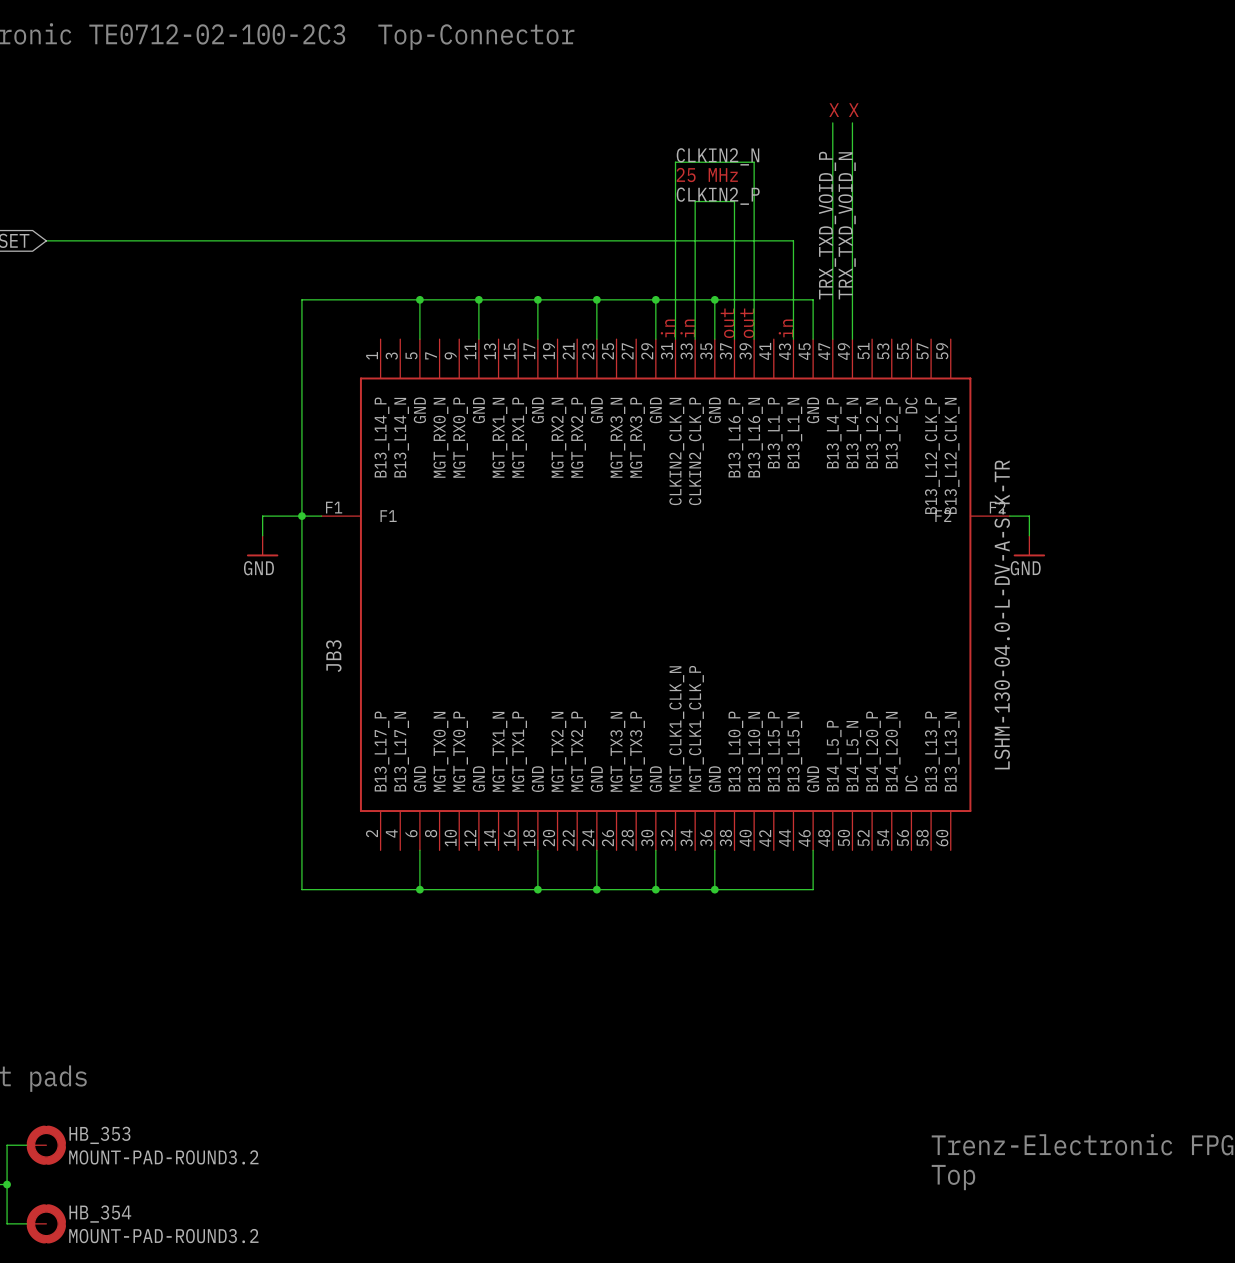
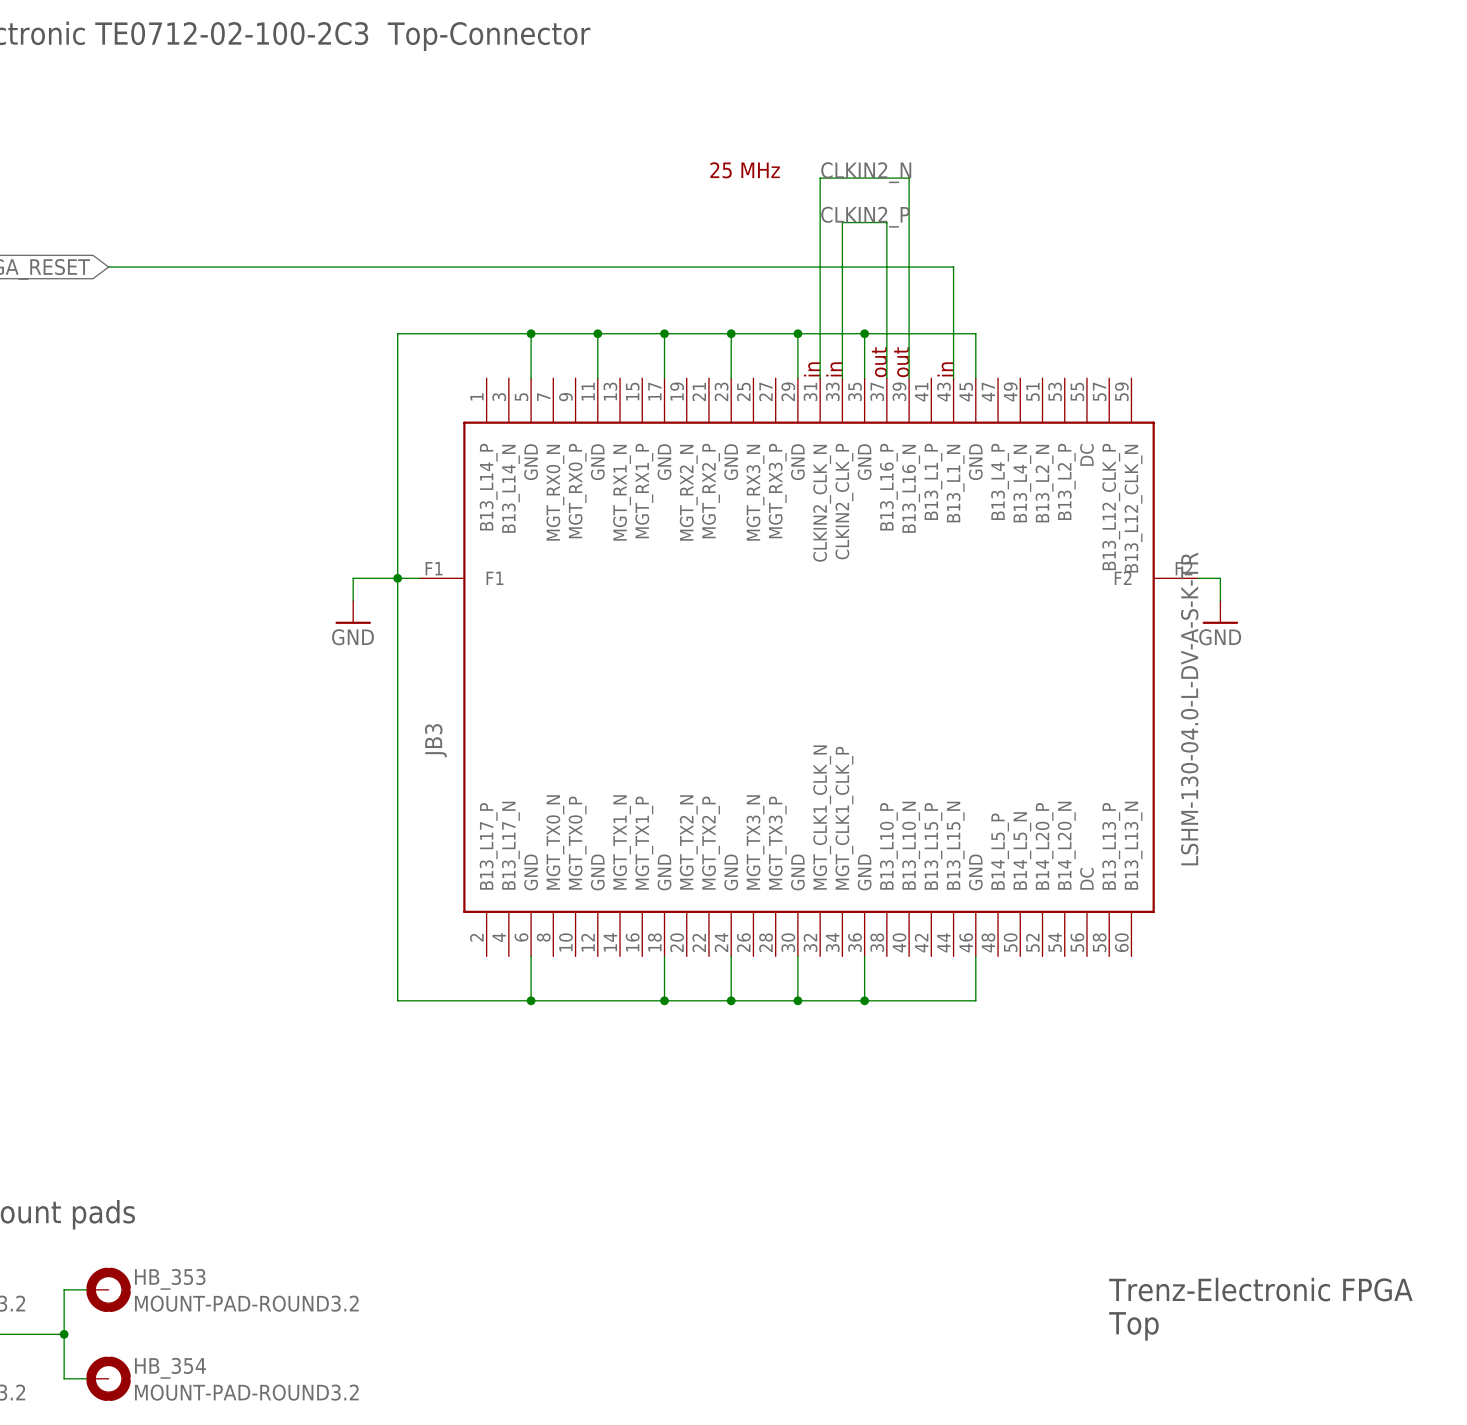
text: X (834, 110) -> none
text: X (853, 110) -> none
wire: (832, 122) (832, 339) -> none
wire: (852, 122) (852, 339) -> none
text position: 25 MHz (707, 175) -> 25 MHz (745, 170)
label: TRX_TXD_VOID_P (827, 225) -> none
label: TRX_TXD_VOID_N (847, 225) -> none

